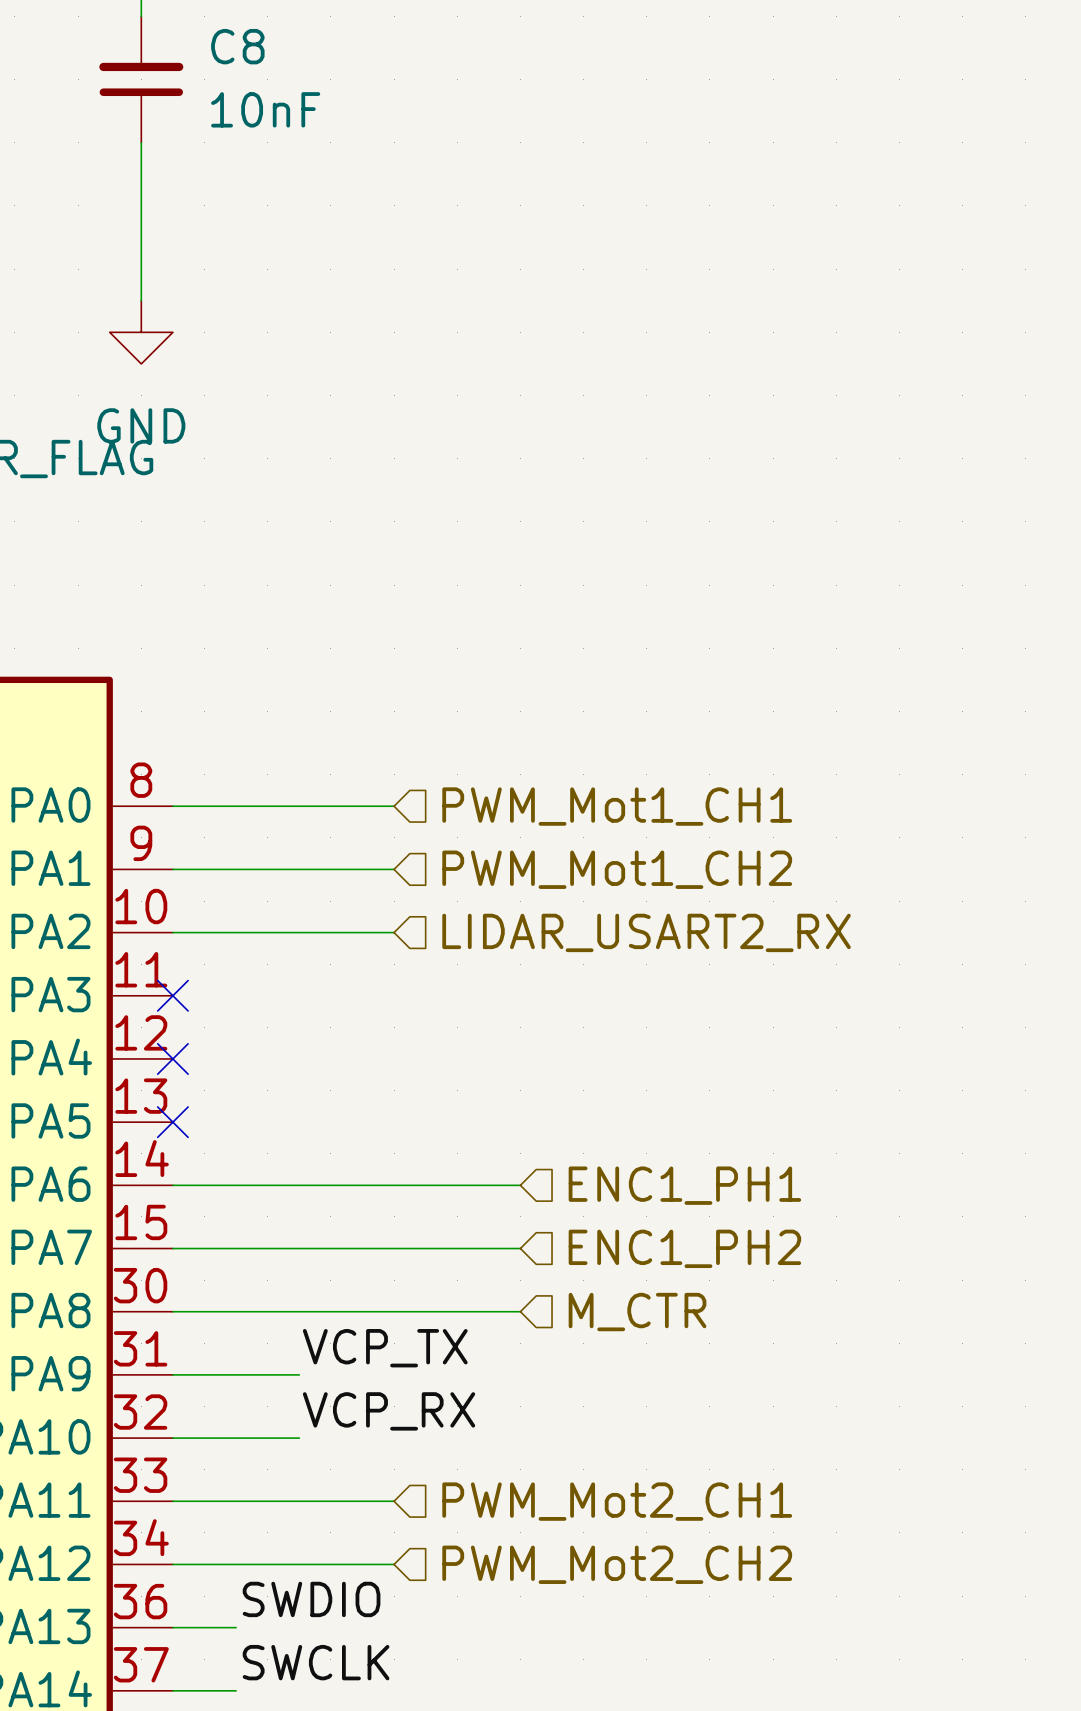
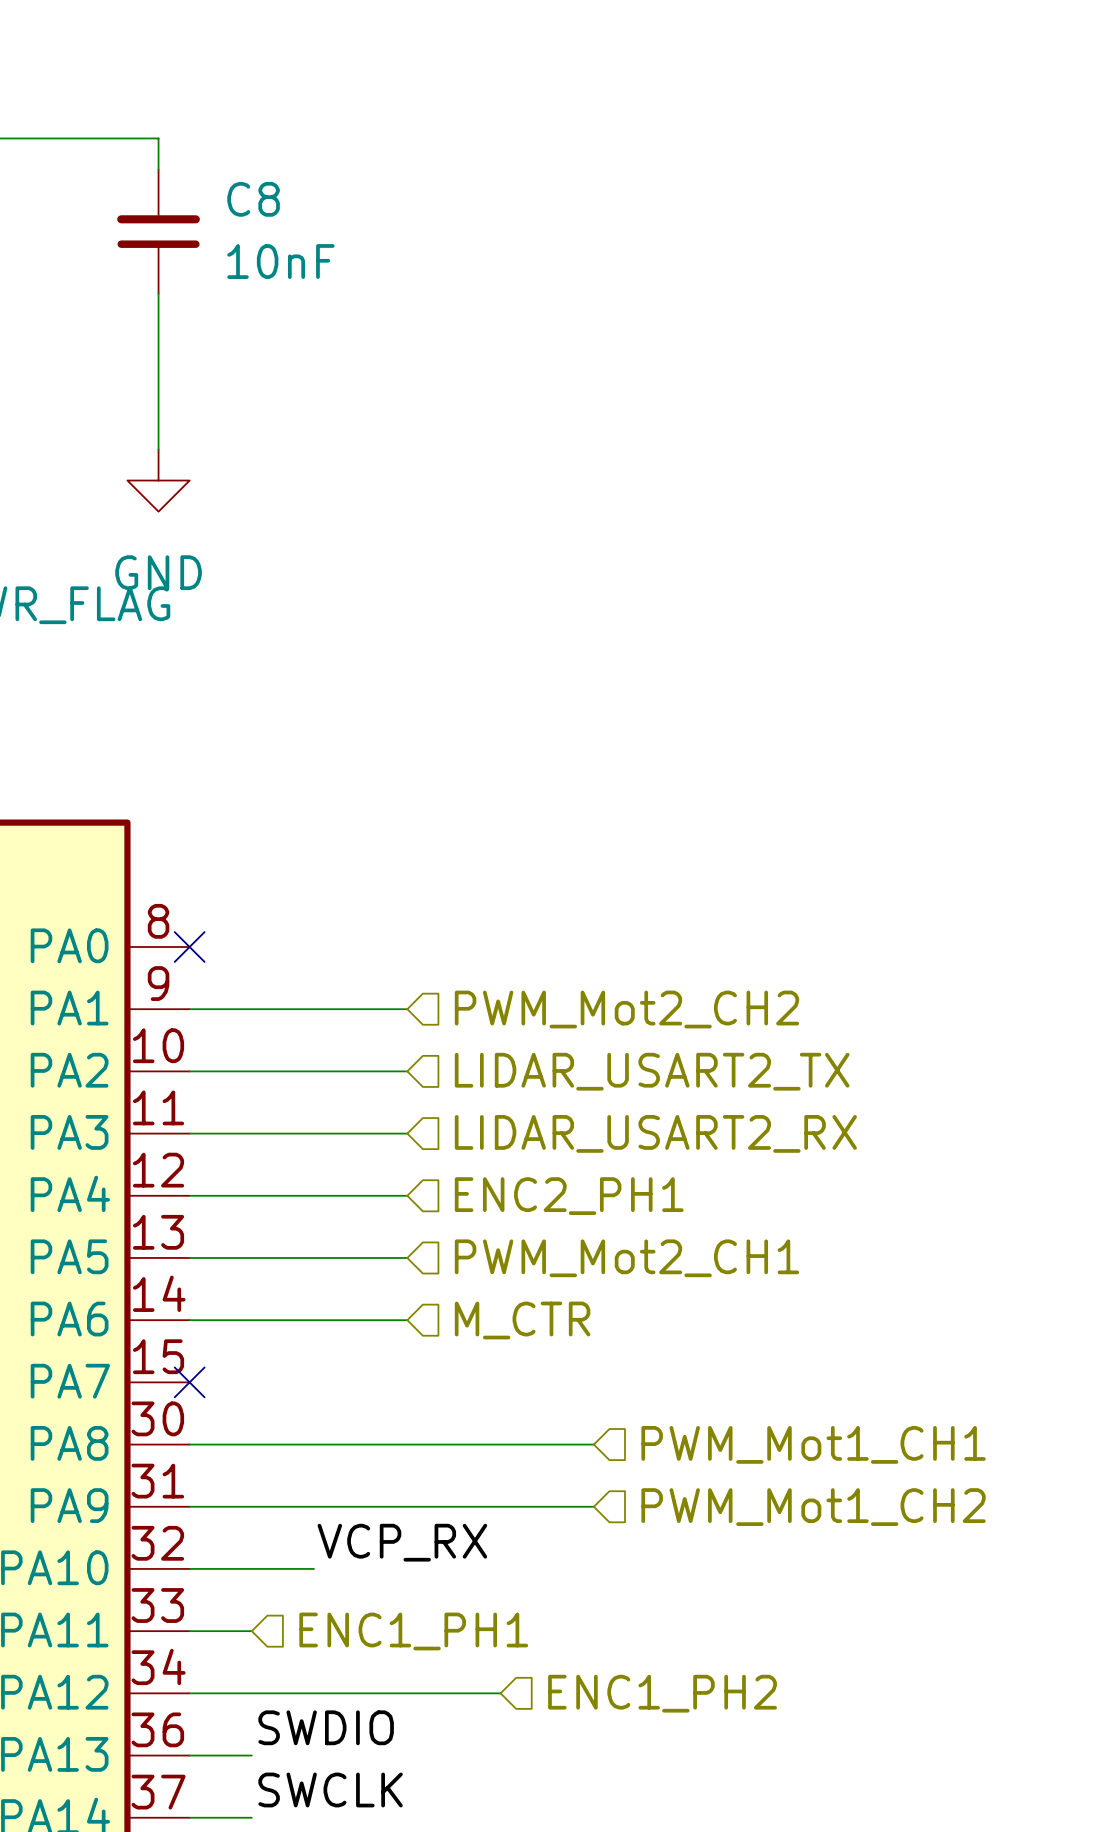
wire: (172, 806) (394, 806) -> (189, 1133) (407, 1133)
no-connect mark: none -> (189, 947)
hierarchical label position: PWM_Mot1_CH1 (617, 806) -> PWM_Mot1_CH1 (813, 1444)
hierarchical label: PWM_Mot1_CH2 (617, 869) -> PWM_Mot2_CH2 (626, 1009)
hierarchical label: LIDAR_USART2_RX (646, 932) -> LIDAR_USART2_TX (652, 1071)
no-connect mark: (172, 995) -> none
hierarchical label: none -> LIDAR_USART2_RX (655, 1133)
wire: none -> (189, 1195) (407, 1195)
no-connect mark: (172, 1058) -> none
hierarchical label: none -> ENC2_PH1 (569, 1196)
wire: none -> (189, 1257) (407, 1257)
no-connect mark: (172, 1122) -> none
wire: (394, 1185) (520, 1185) -> none
hierarchical label position: ENC1_PH1 (684, 1185) -> ENC1_PH1 (413, 1631)
wire: (172, 1248) (520, 1248) -> none
no-connect mark: none -> (189, 1382)
hierarchical label position: ENC1_PH2 (684, 1248) -> ENC1_PH2 (662, 1693)
wire: none -> (531, 1444) (593, 1444)
hierarchical label position: M_CTR (637, 1312) -> M_CTR (522, 1320)
label: VCP_TX (385, 1348) -> none
wire: none -> (314, 1506) (593, 1506)
hierarchical label: none -> PWM_Mot1_CH2 (813, 1507)
wire: (236, 1501) (394, 1501) -> none
hierarchical label position: PWM_Mot2_CH1 (617, 1501) -> PWM_Mot2_CH1 (626, 1258)
wire: none -> (407, 1693) (500, 1693)
hierarchical label: PWM_Mot2_CH2 (617, 1564) -> none

